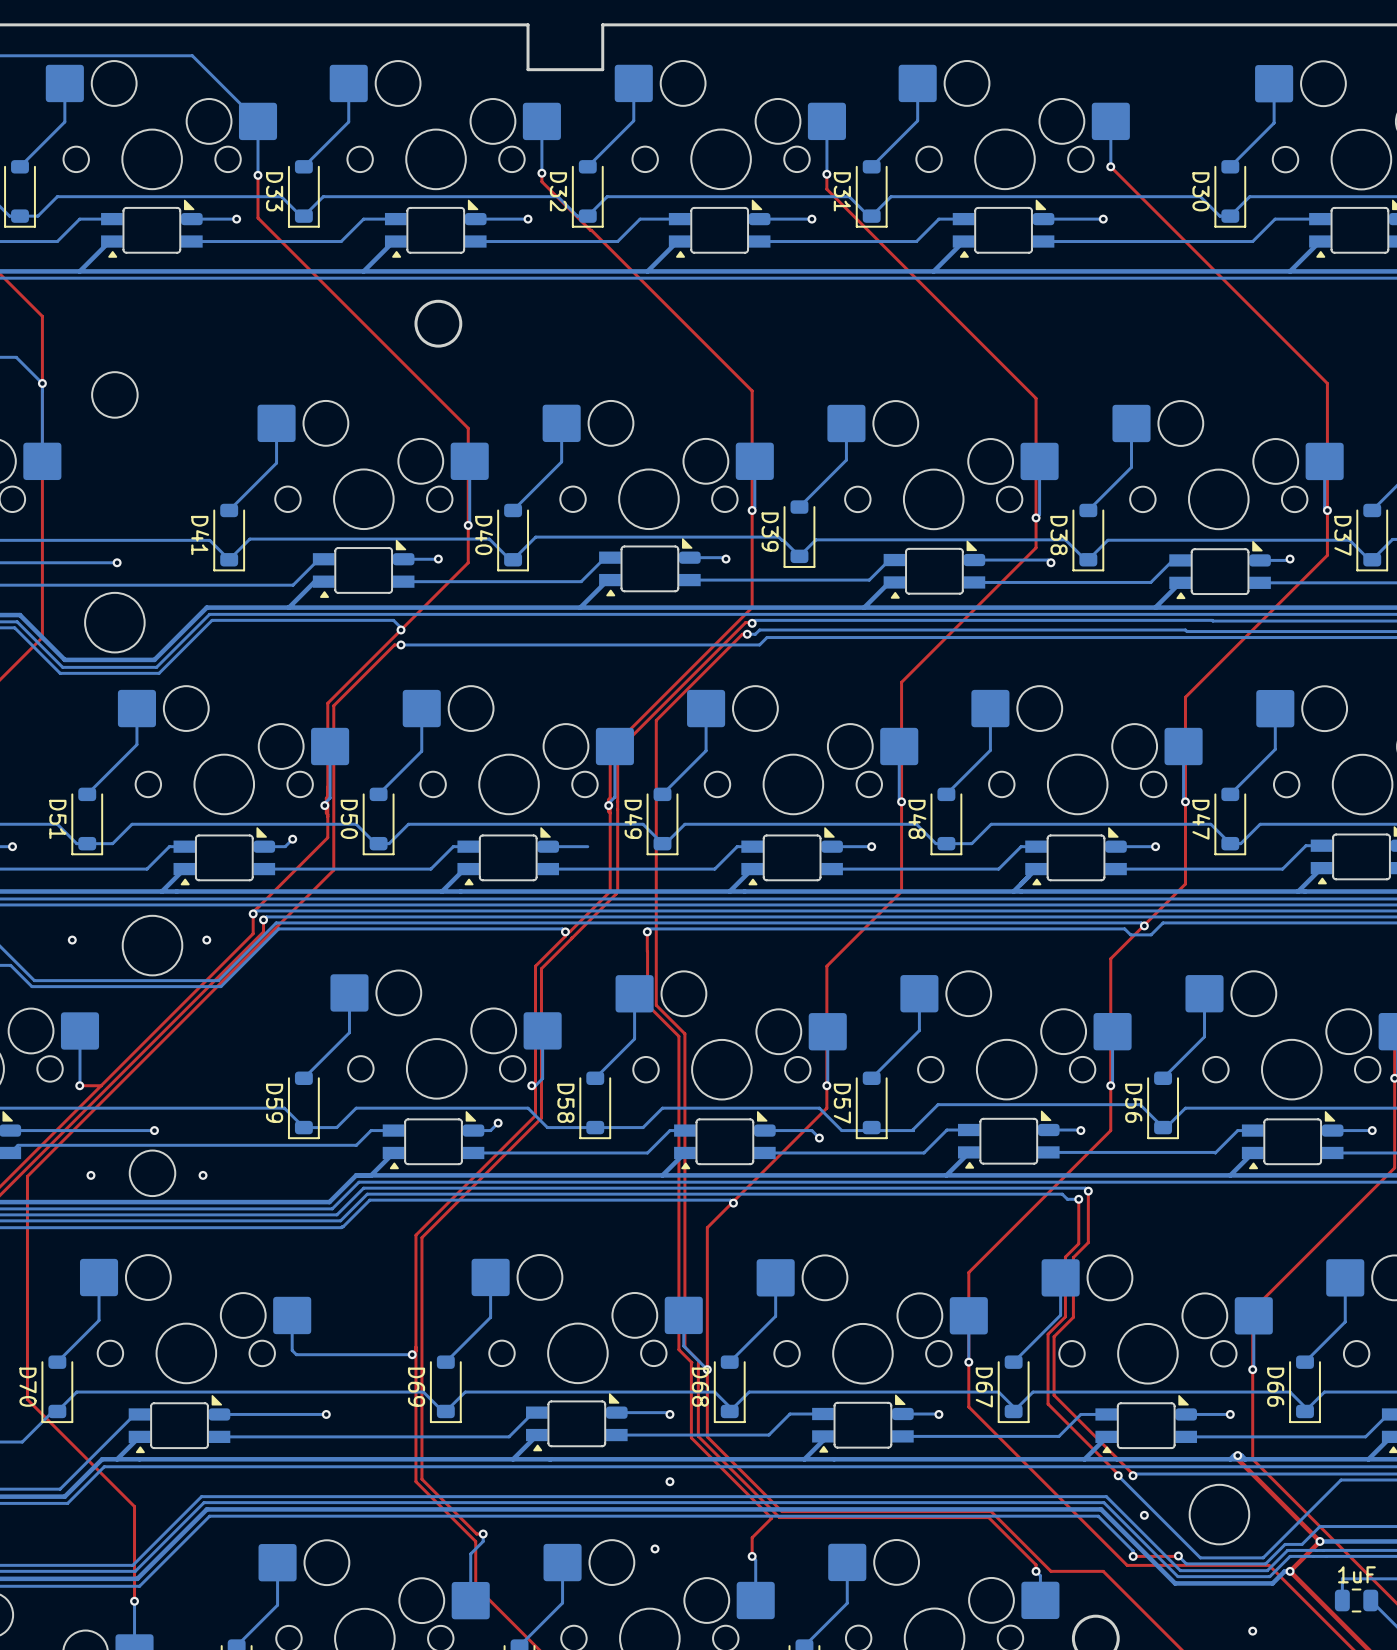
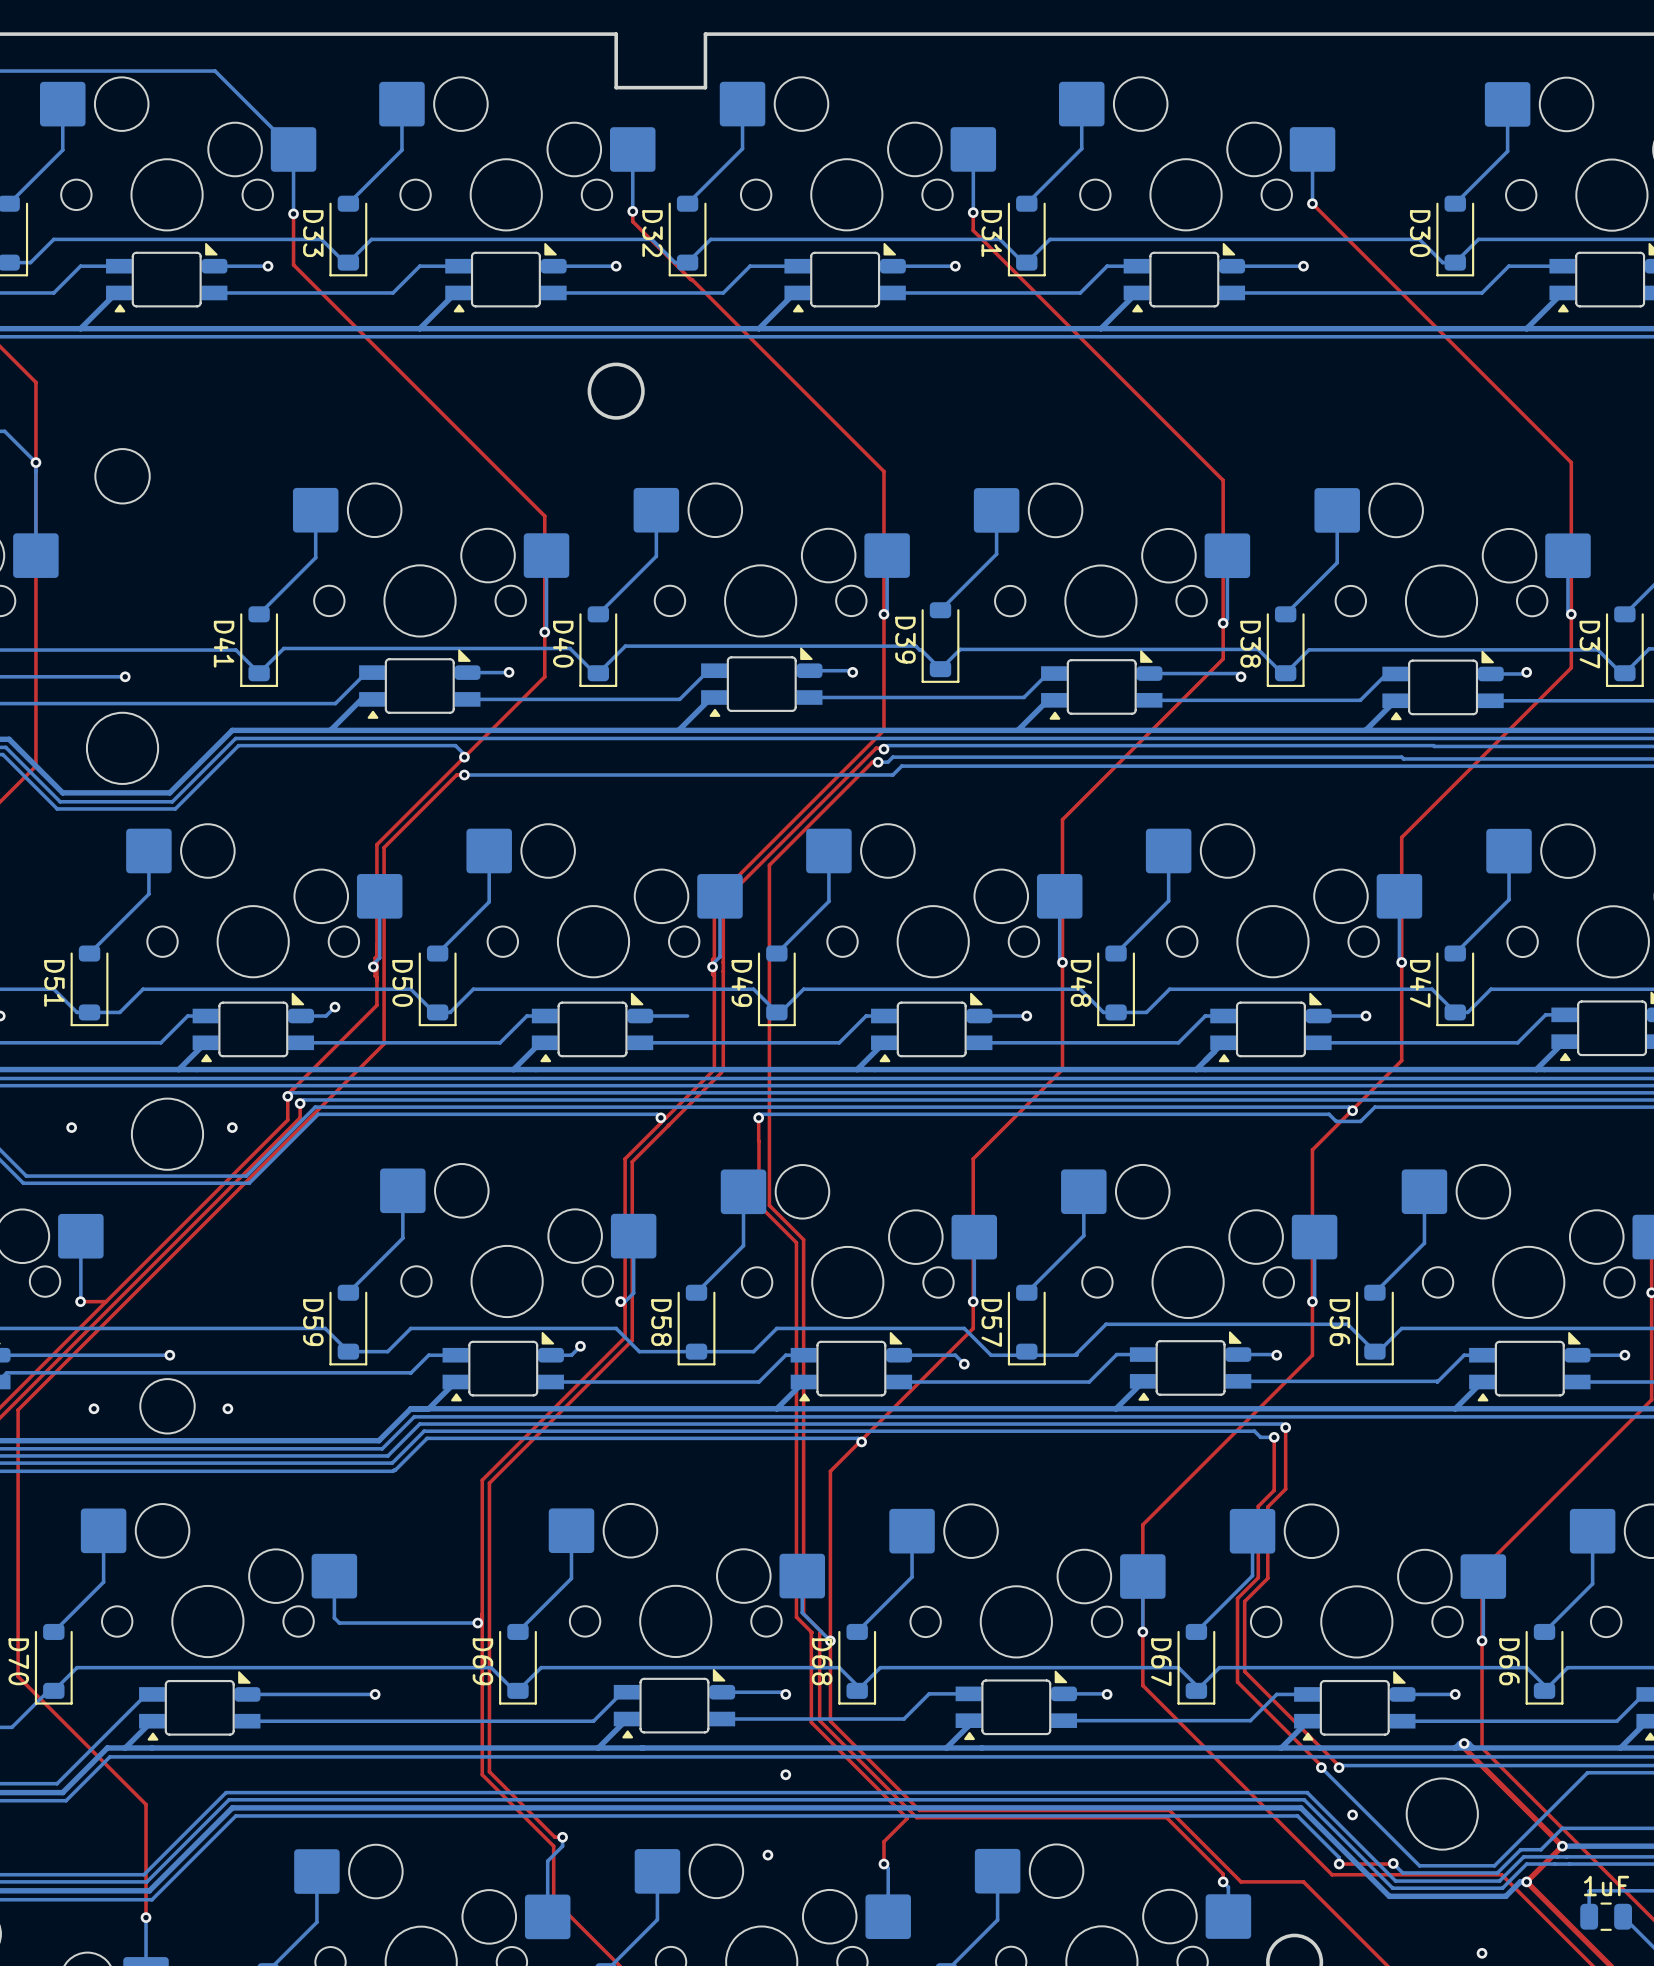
round board edge position: (438, 323) -> (616, 391)

